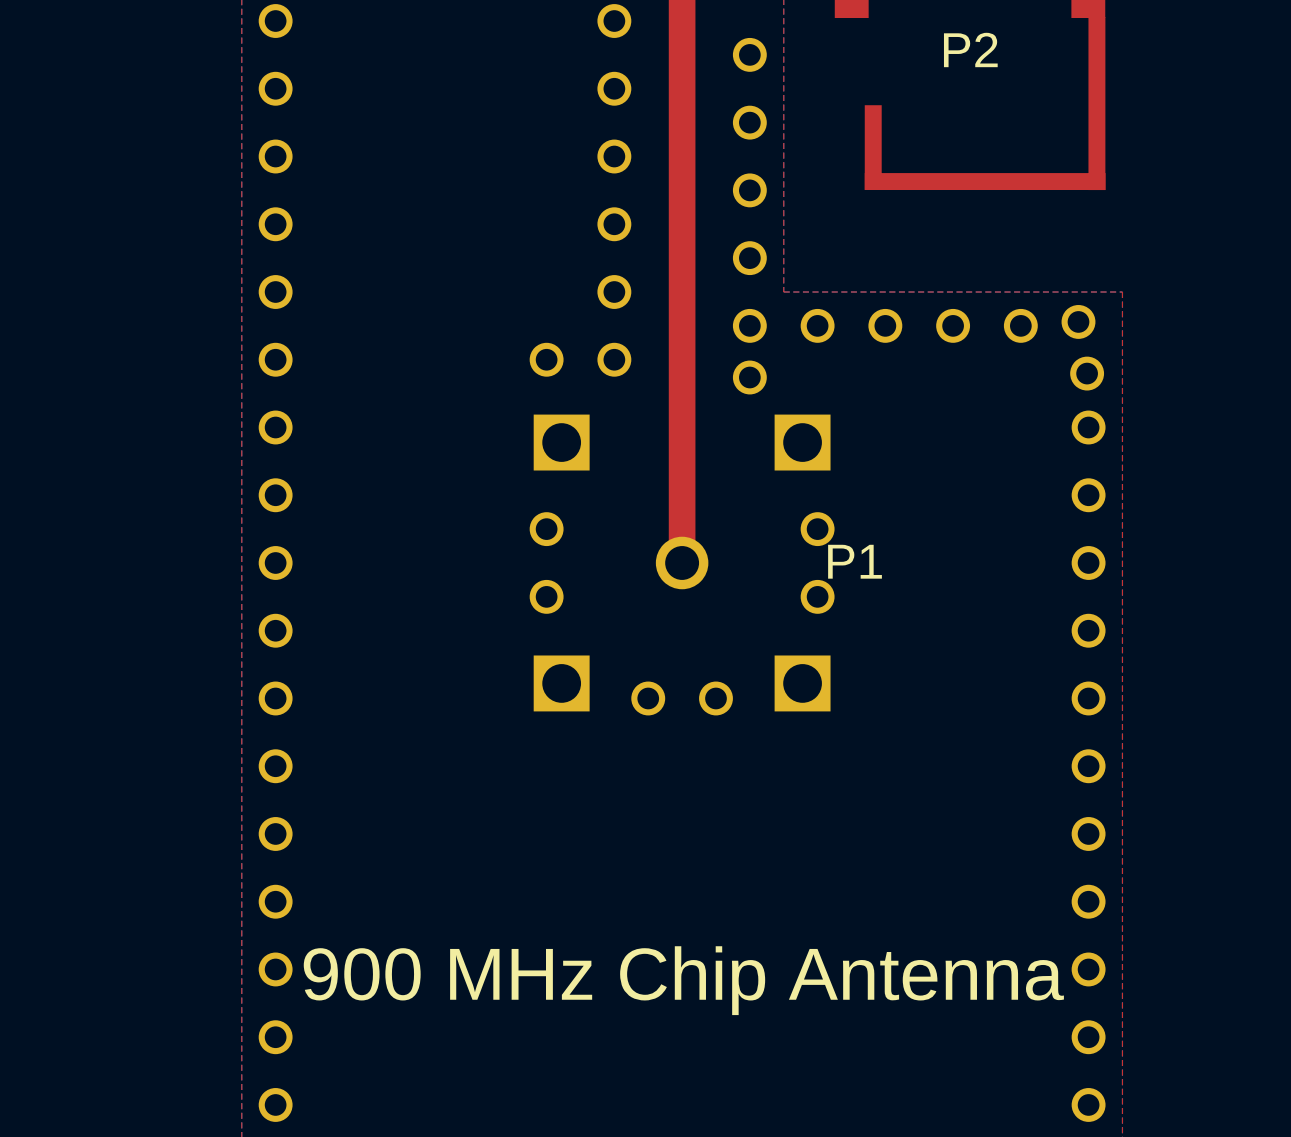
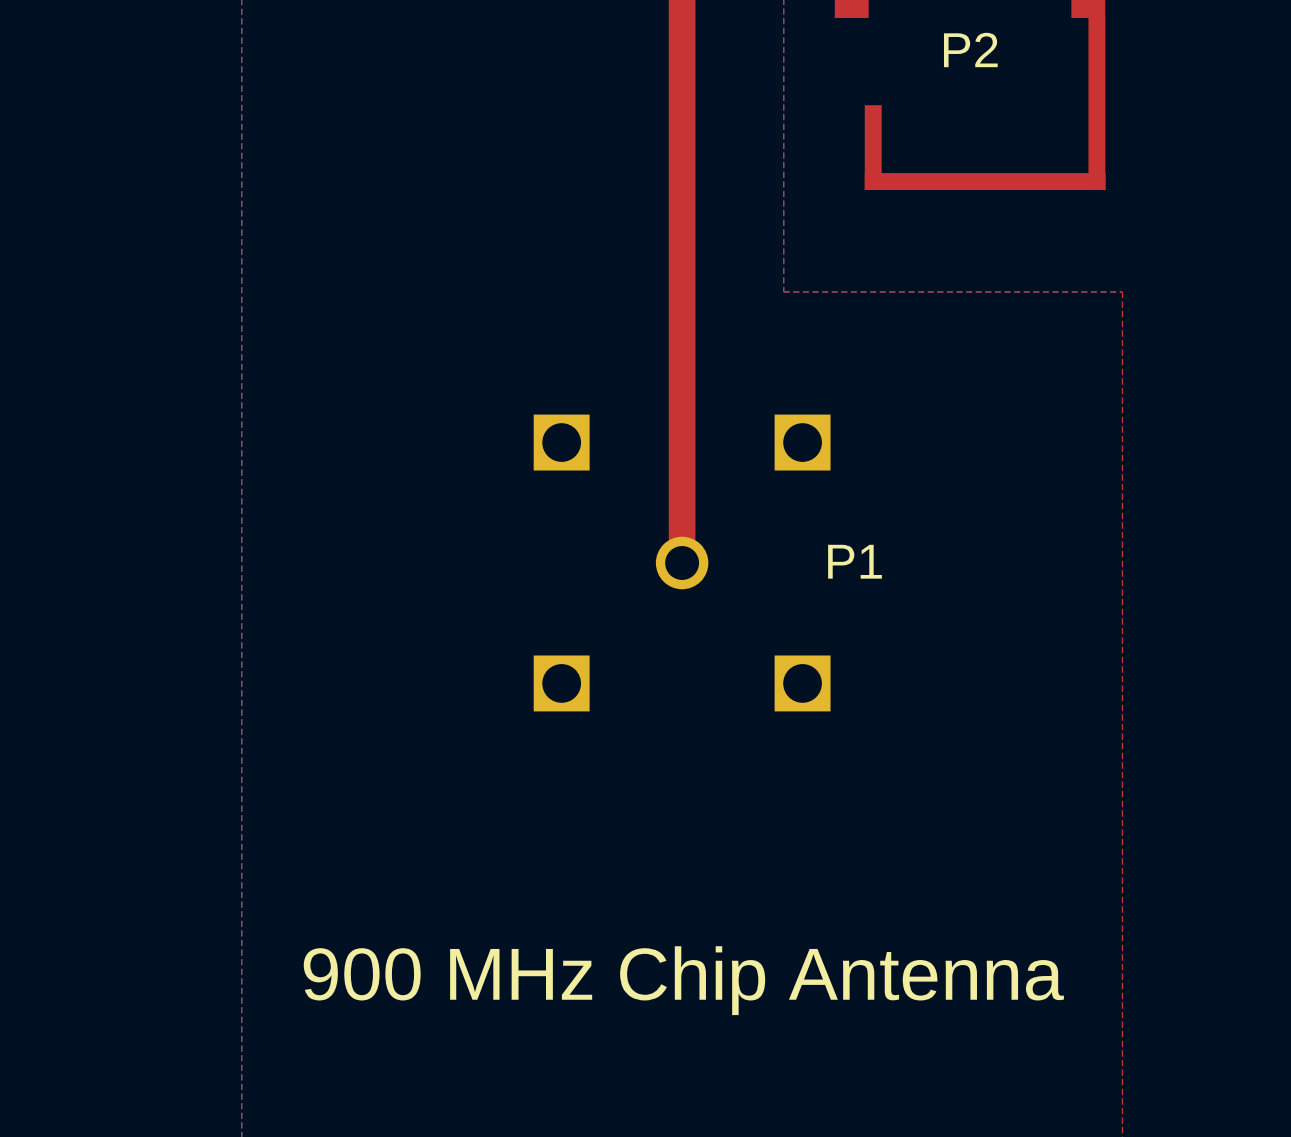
part: (275, 21) -> none
part: (614, 21) -> none
part: (749, 54) -> none
part: (275, 88) -> none
part: (614, 88) -> none
part: (749, 122) -> none
part: (275, 156) -> none
part: (614, 156) -> none
part: (749, 190) -> none
part: (275, 224) -> none
part: (614, 224) -> none
part: (749, 258) -> none
part: (275, 292) -> none
part: (614, 292) -> none
part: (1078, 321) -> none
part: (749, 325) -> none
part: (817, 325) -> none
part: (885, 325) -> none
part: (953, 325) -> none
part: (1020, 325) -> none
part: (275, 359) -> none
part: (546, 359) -> none
part: (614, 359) -> none
part: (1087, 373) -> none
part: (749, 377) -> none
part: (275, 427) -> none
part: (1088, 427) -> none
part: (275, 495) -> none
part: (1088, 495) -> none
part: (546, 529) -> none
part: (817, 529) -> none
part: (275, 562) -> none
part: (1088, 562) -> none
part: (546, 596) -> none
part: (817, 596) -> none
part: (275, 630) -> none
part: (1088, 630) -> none
part: (275, 698) -> none
part: (648, 698) -> none
part: (715, 698) -> none
part: (1088, 698) -> none
part: (275, 766) -> none
part: (1088, 766) -> none
part: (275, 833) -> none
part: (1088, 833) -> none
part: (275, 901) -> none
part: (1088, 901) -> none
part: (275, 969) -> none
part: (1088, 969) -> none
part: (275, 1037) -> none
part: (1088, 1037) -> none
part: (275, 1104) -> none
part: (1088, 1104) -> none

